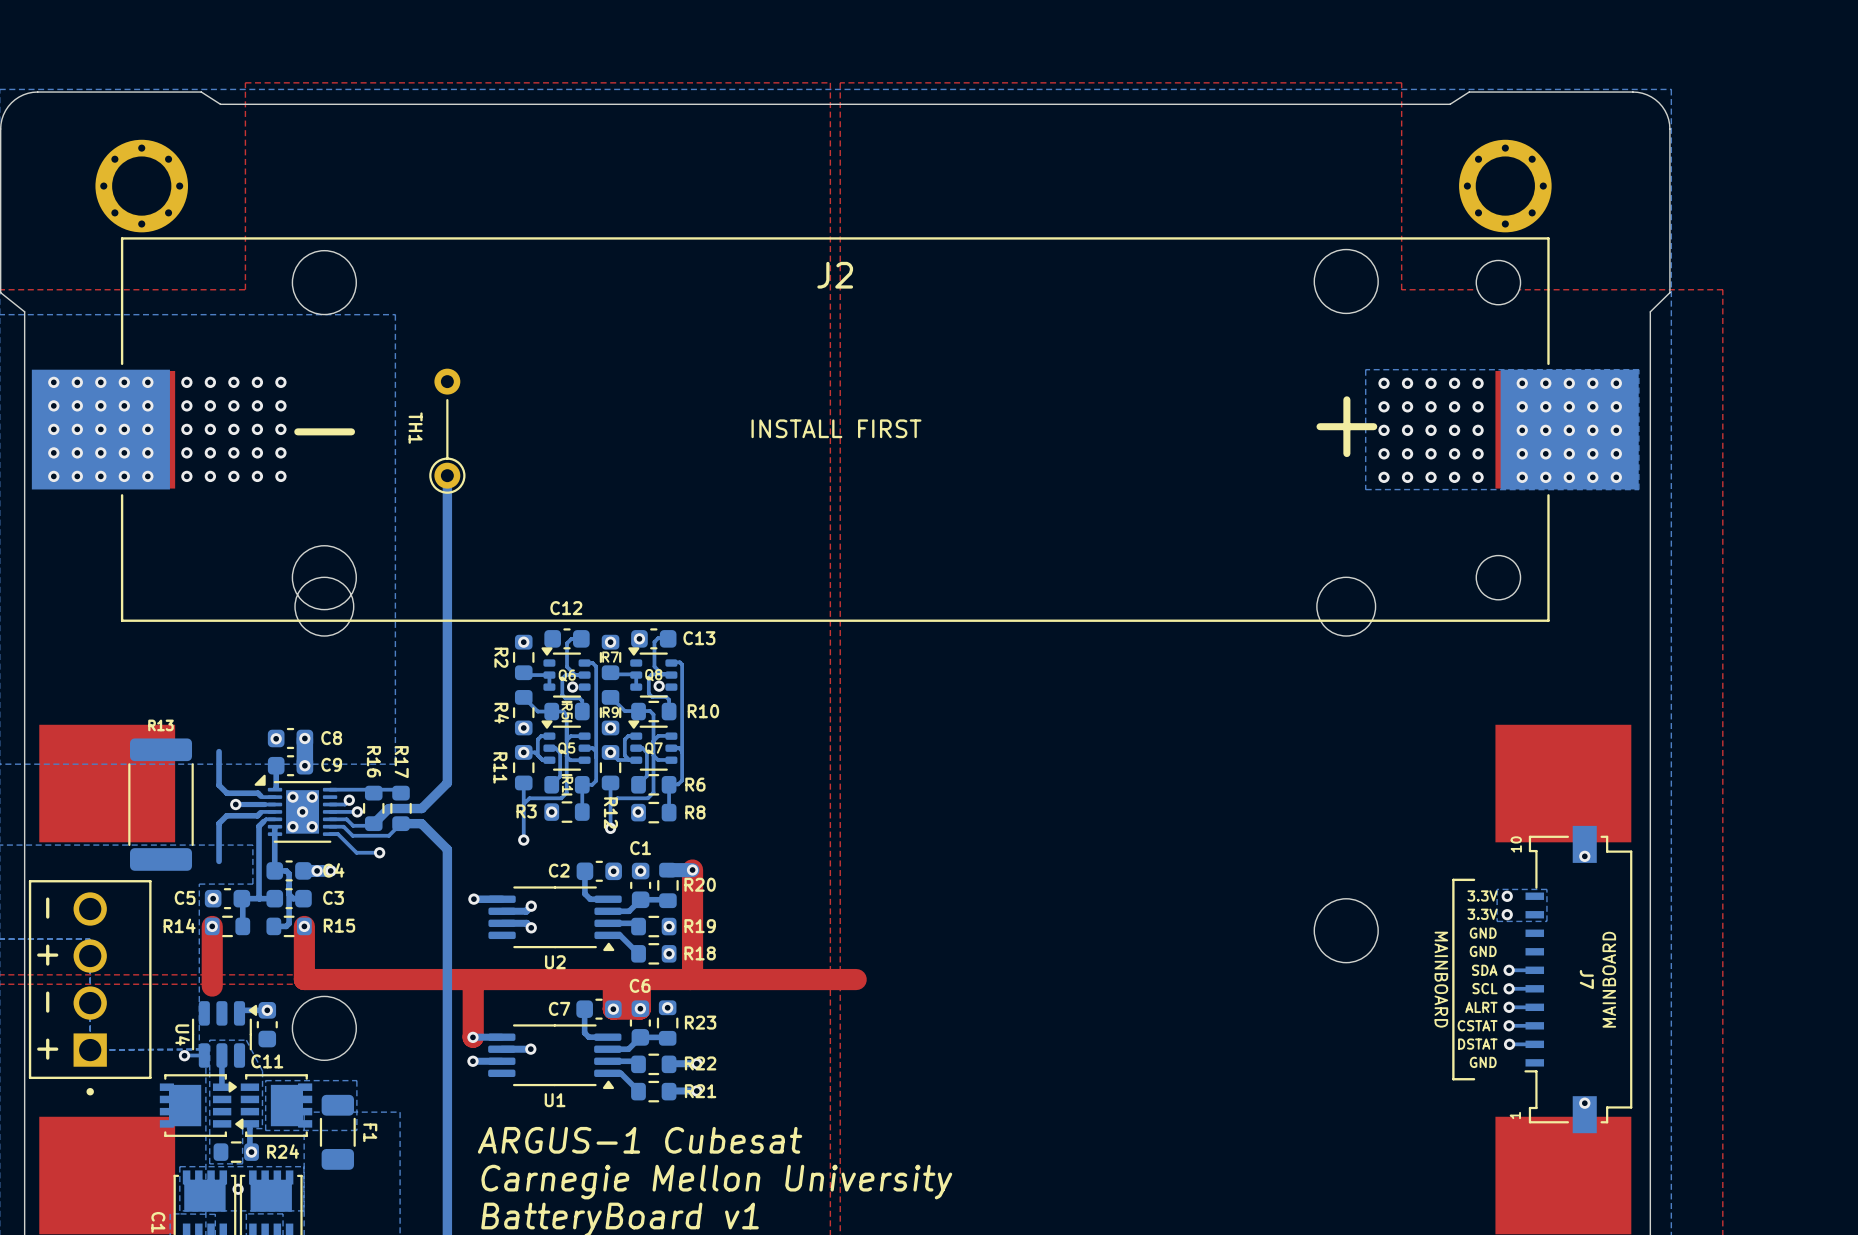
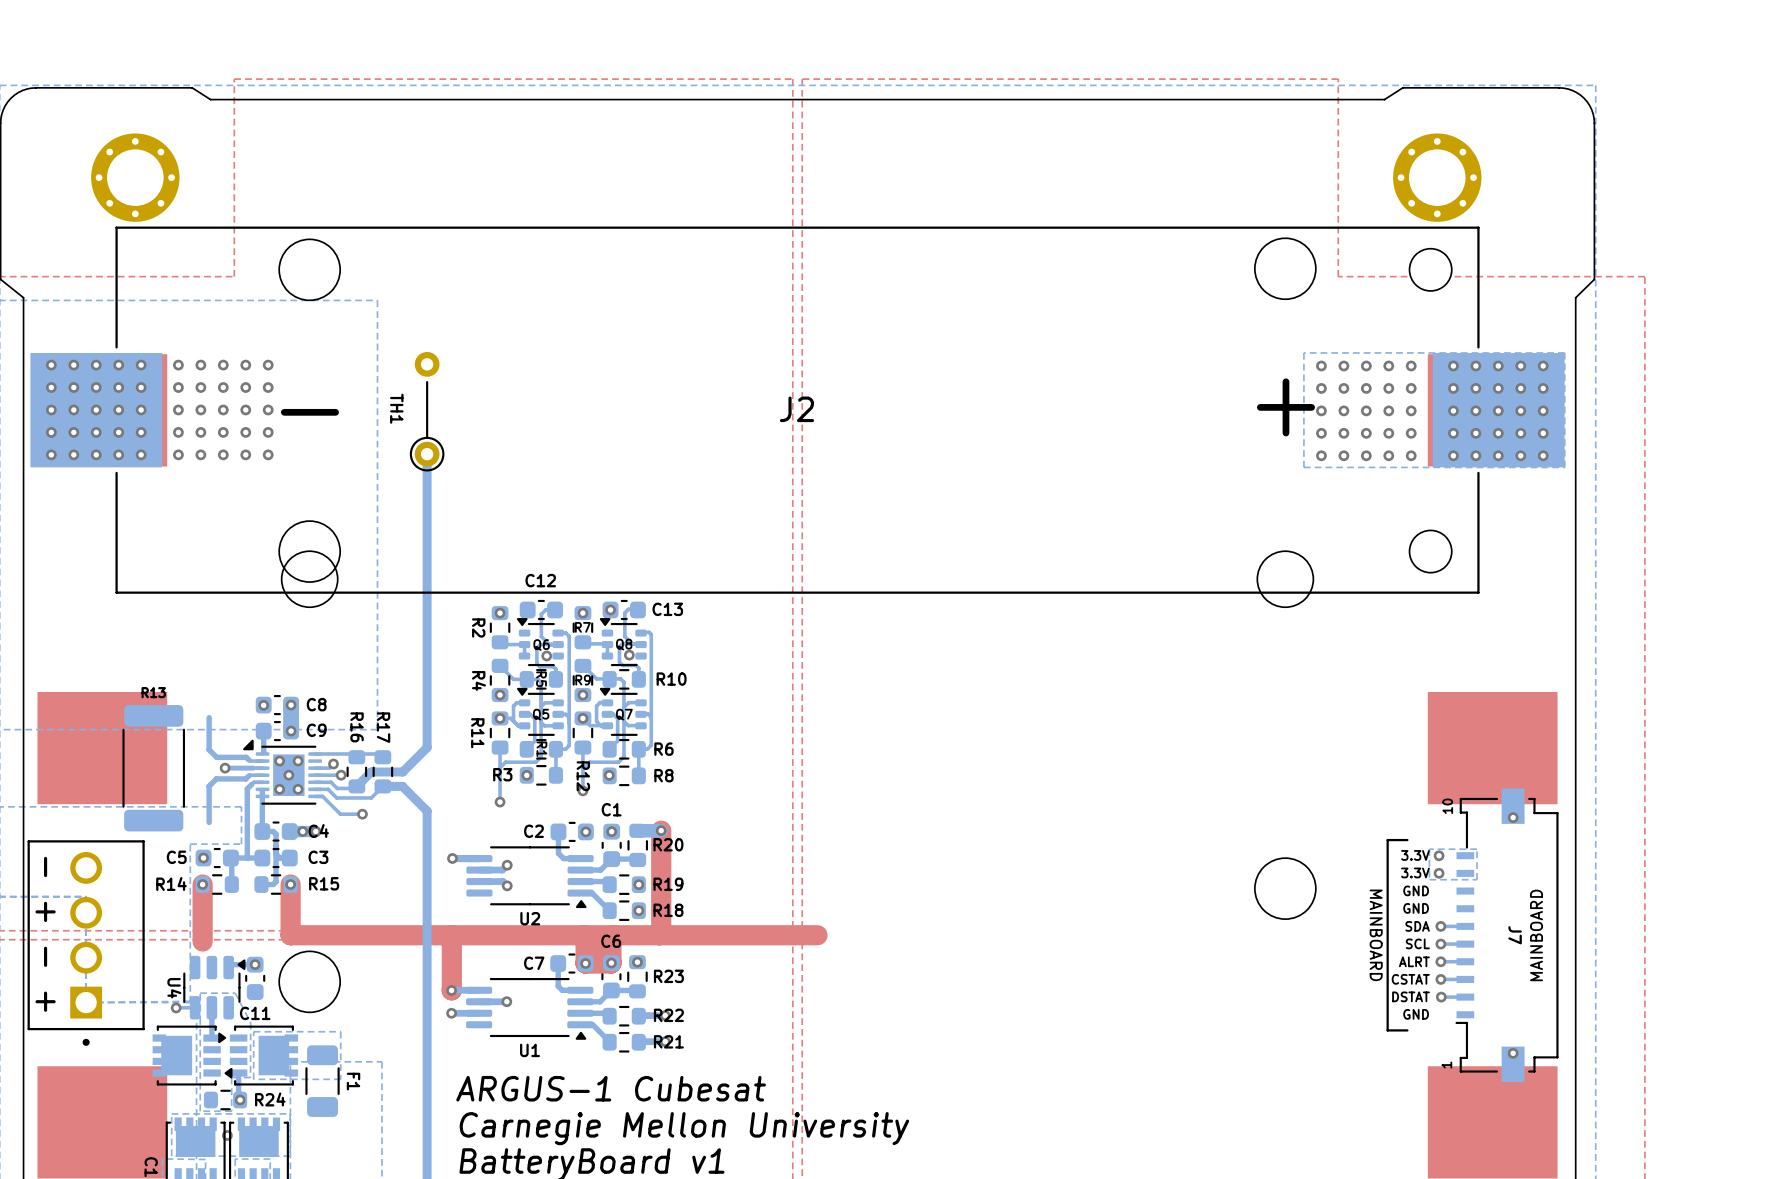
J2 name position: J2 (835, 275) -> J2 (796, 409)
text: INSTALL FIRST (836, 428) -> none

